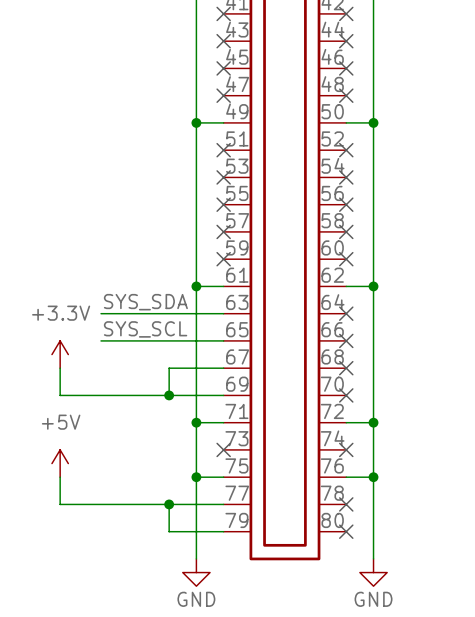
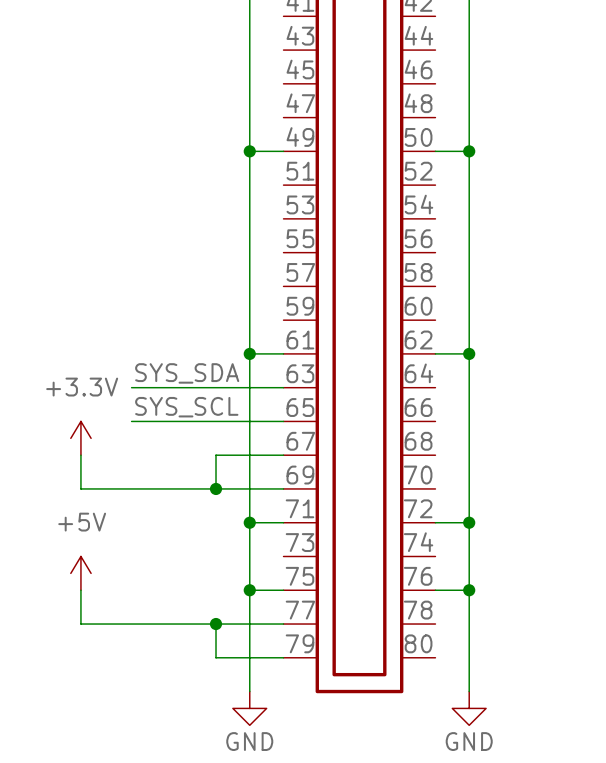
no-connect mark: (223, 13) -> none
no-connect mark: (346, 13) -> none
no-connect mark: (223, 41) -> none
no-connect mark: (346, 41) -> none
no-connect mark: (223, 68) -> none
no-connect mark: (346, 68) -> none
no-connect mark: (223, 95) -> none
no-connect mark: (346, 95) -> none
no-connect mark: (223, 150) -> none
no-connect mark: (346, 150) -> none
no-connect mark: (223, 177) -> none
no-connect mark: (346, 177) -> none
no-connect mark: (223, 204) -> none
no-connect mark: (346, 204) -> none
no-connect mark: (223, 231) -> none
no-connect mark: (346, 231) -> none
no-connect mark: (223, 259) -> none
no-connect mark: (346, 259) -> none
no-connect mark: (346, 313) -> none
no-connect mark: (346, 340) -> none
no-connect mark: (346, 368) -> none
no-connect mark: (346, 395) -> none
no-connect mark: (223, 449) -> none
no-connect mark: (346, 449) -> none
no-connect mark: (346, 504) -> none
no-connect mark: (346, 531) -> none

